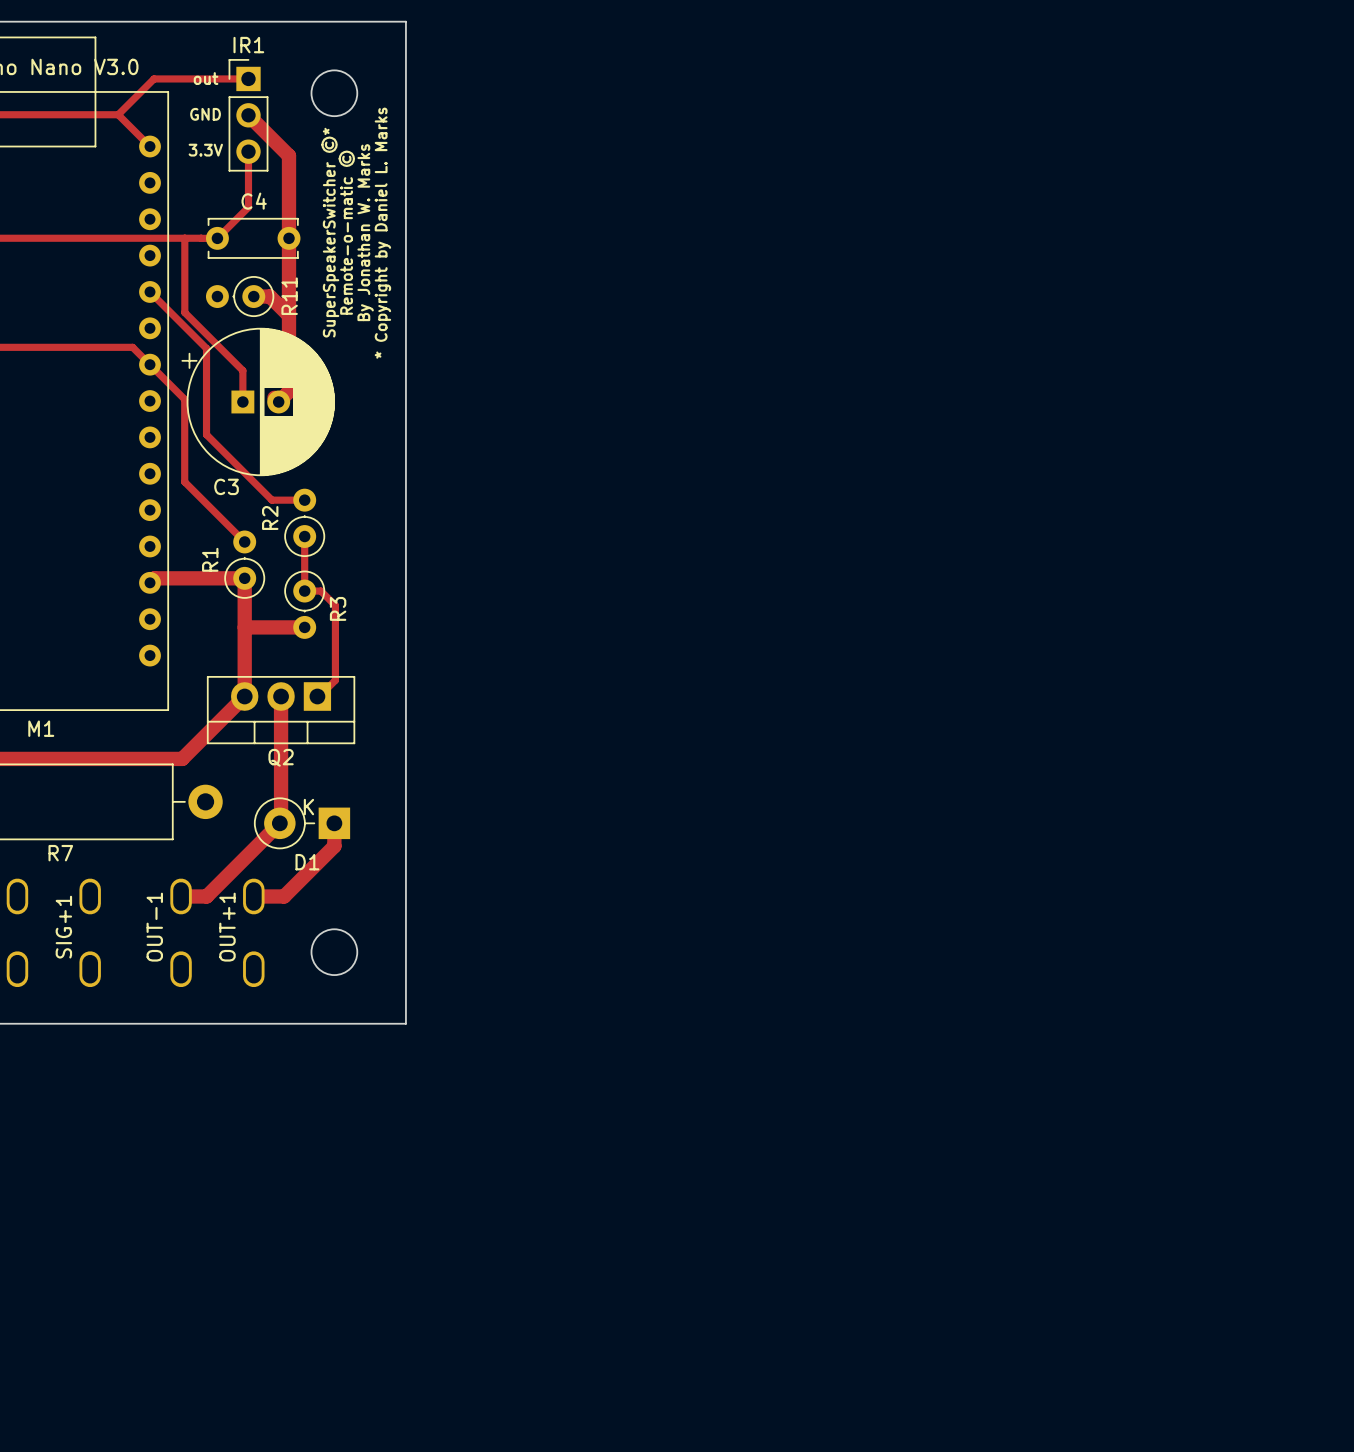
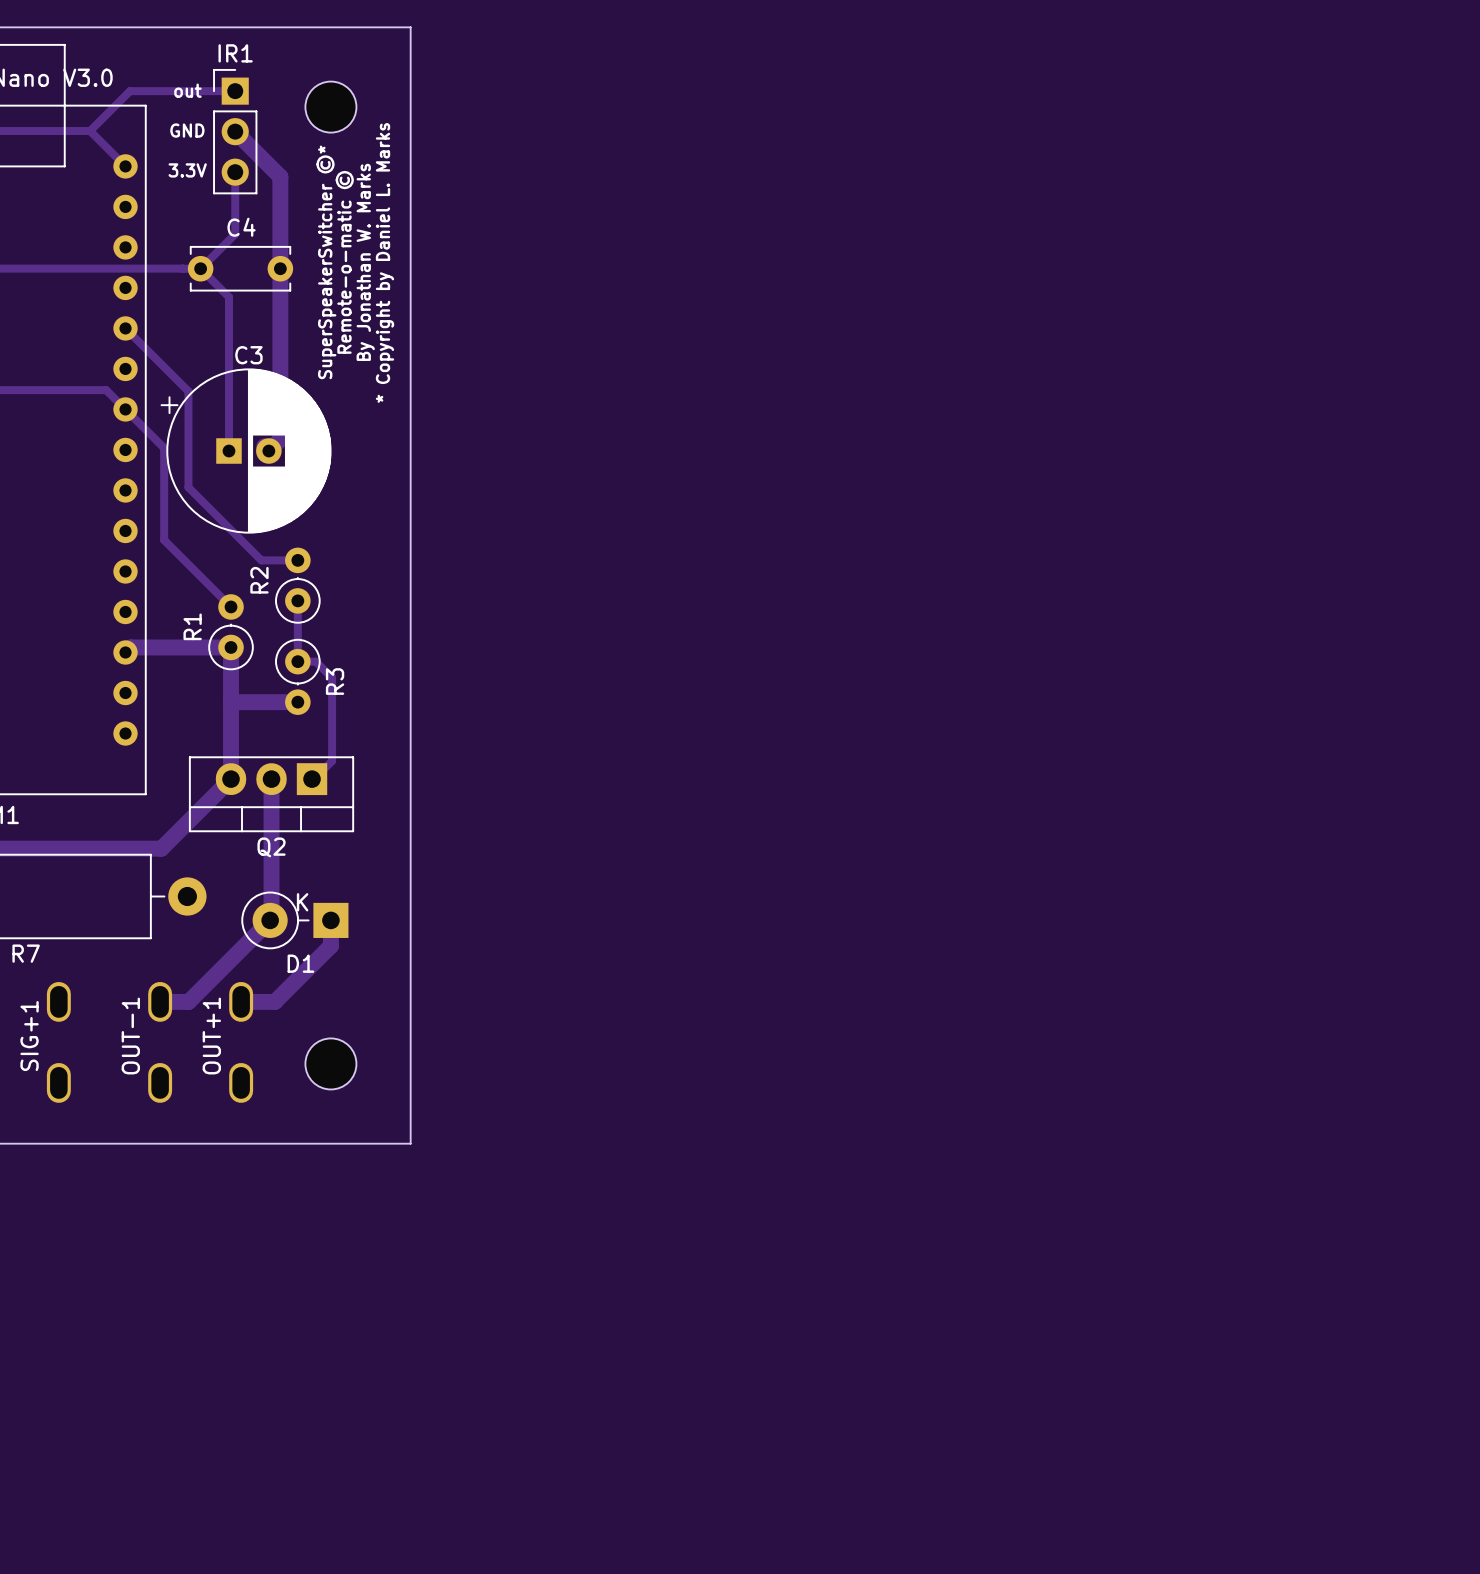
track: (184, 238) (184, 312) (242, 370) -> (200, 268) (228, 297) (228, 416)
R11: (240, 296) -> none
track: (253, 296) (269, 296) (288, 314) -> none
C3 name position: C3 (226, 486) -> C3 (248, 355)

